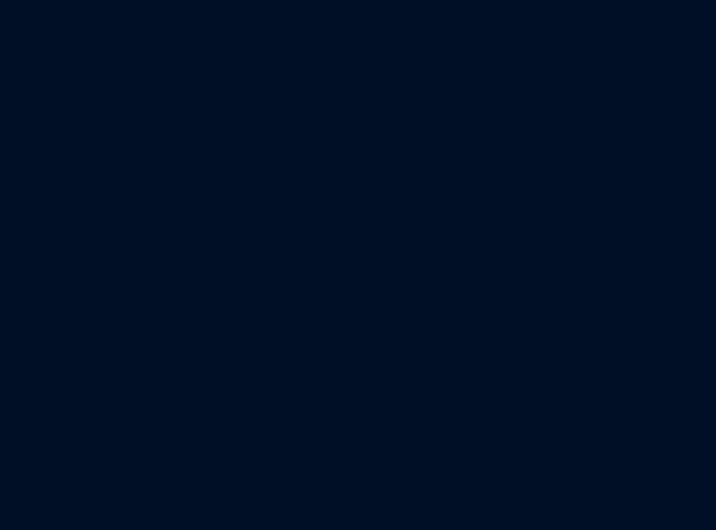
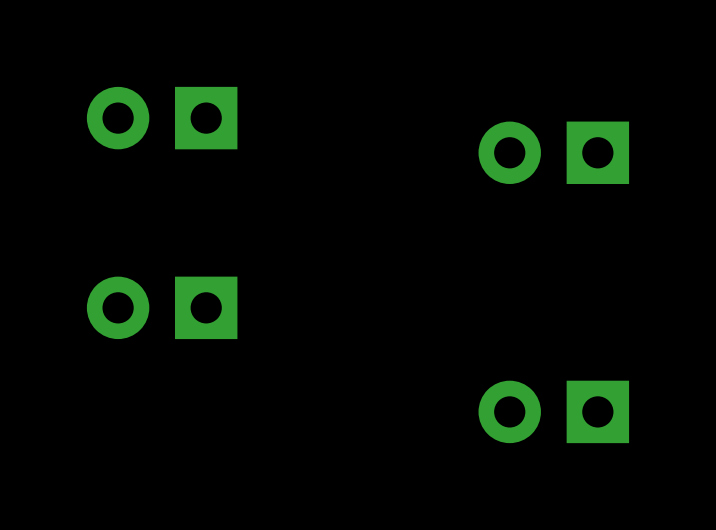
part: none -> (162, 118)
part: none -> (553, 152)
part: none -> (162, 307)
part: none -> (553, 411)

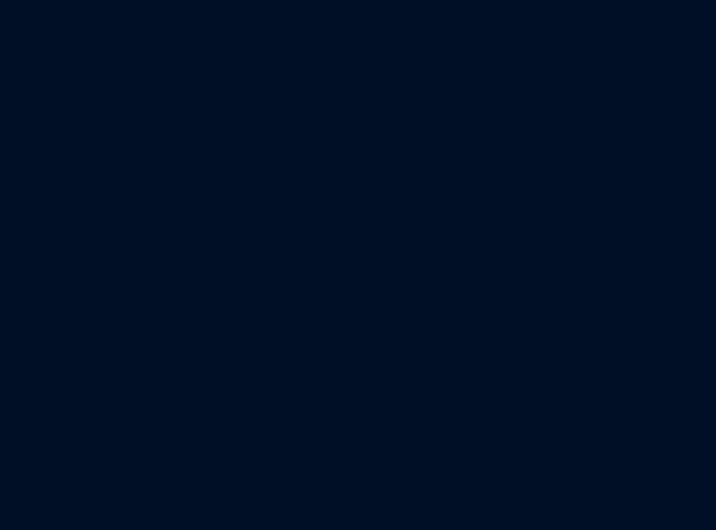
part: (162, 118) -> none
part: (553, 152) -> none
part: (162, 307) -> none
part: (553, 411) -> none

